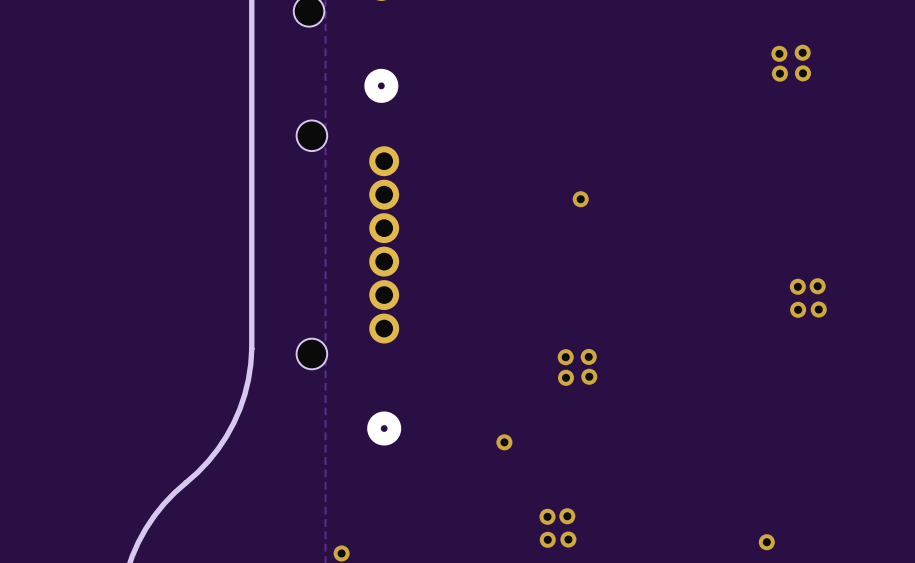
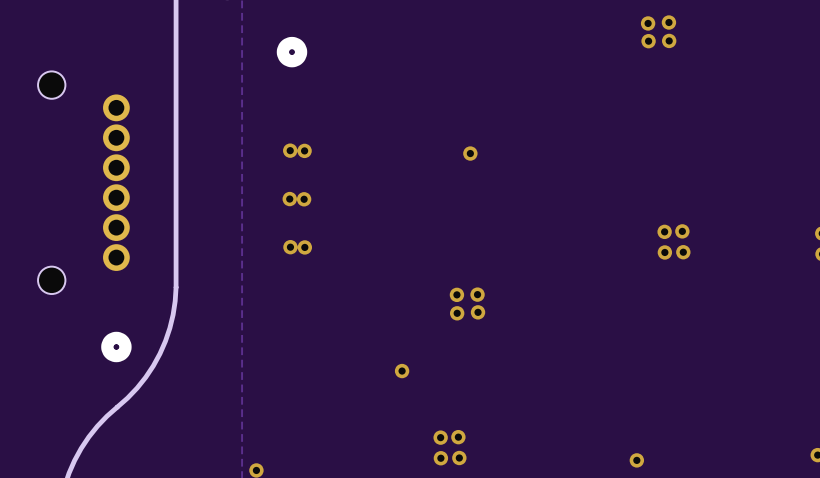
via: none -> (290, 150)
via: none -> (304, 150)
via: none -> (289, 199)
via: none -> (304, 199)
part position: (348, 282) -> (84, 216)
via: none -> (290, 247)
via: none -> (304, 247)

